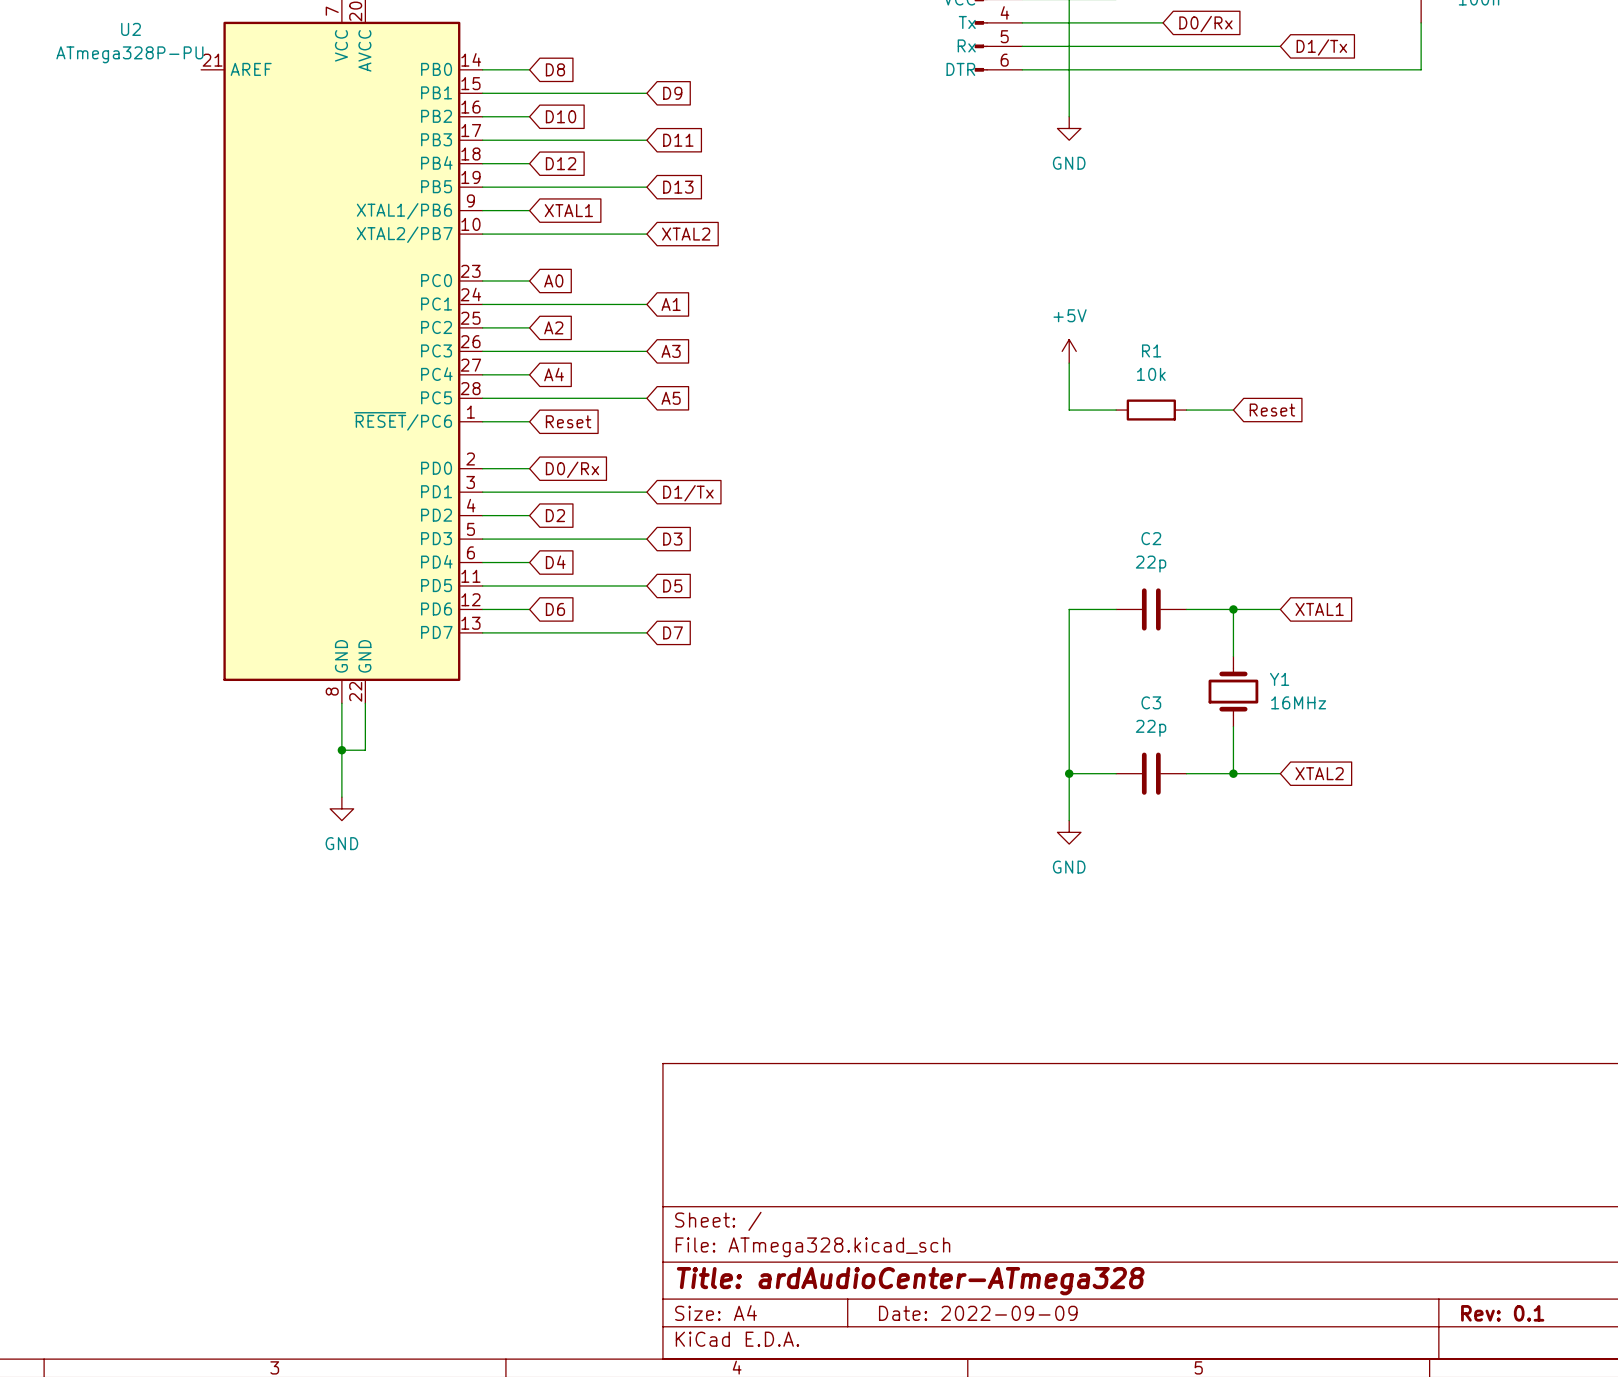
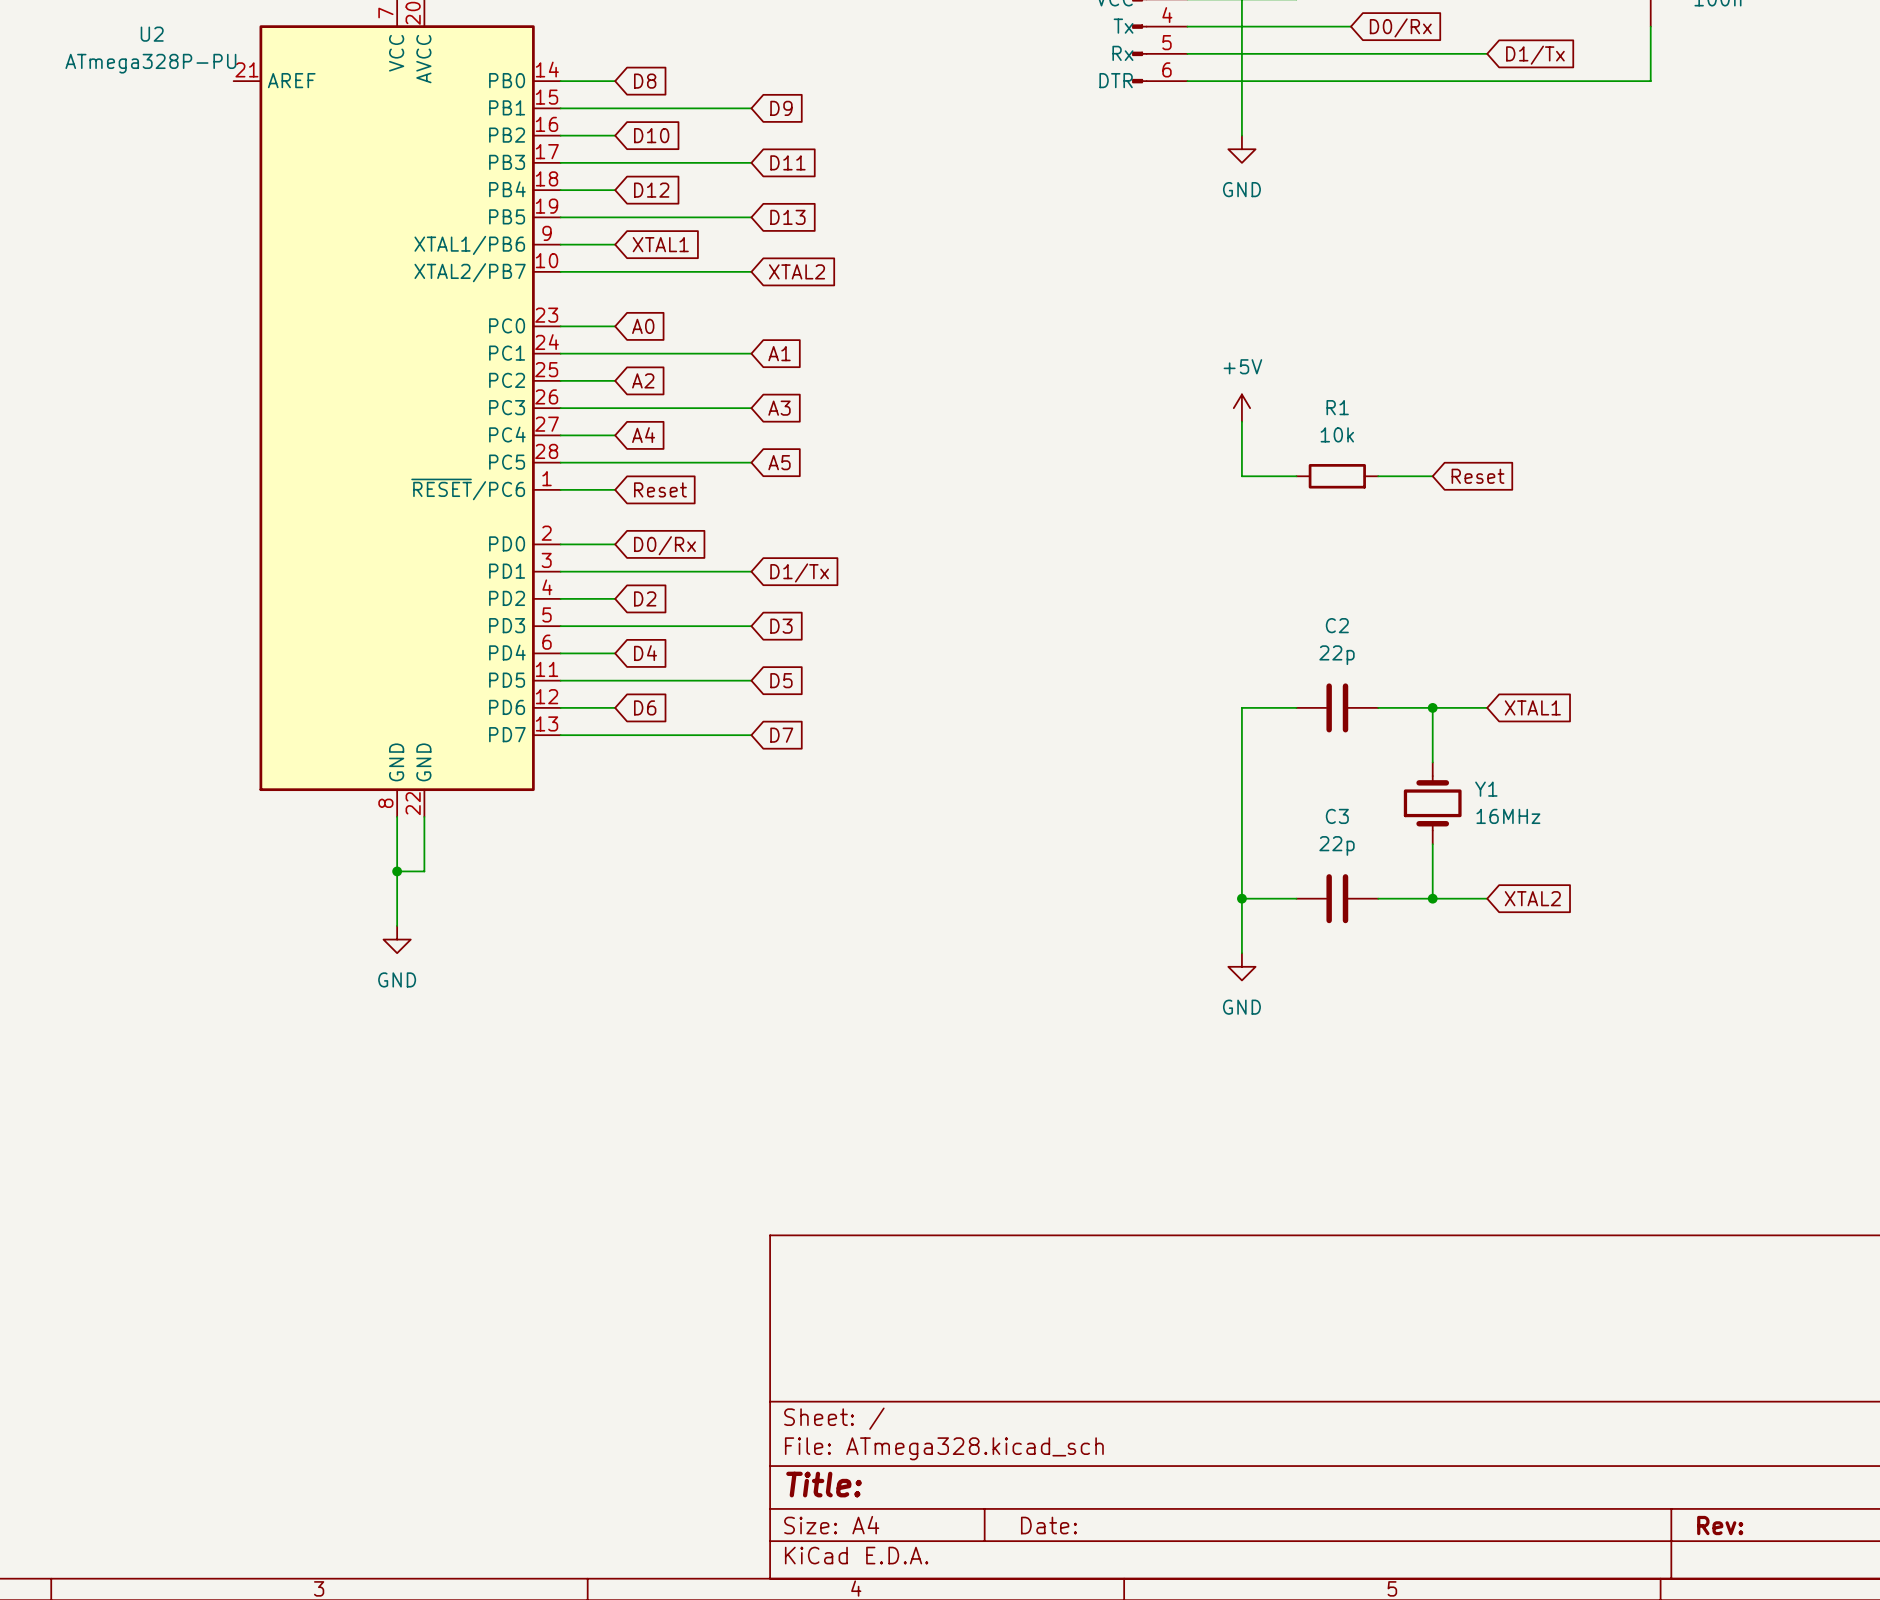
title block: Title: ardAudioCenter-ATmega328 (910, 1281) -> Title: (824, 1484)
title block: Date: 2022-09-09 (978, 1313) -> Date: (1048, 1525)
title block: Rev: 0.1 (1502, 1313) -> Rev: (1720, 1525)

